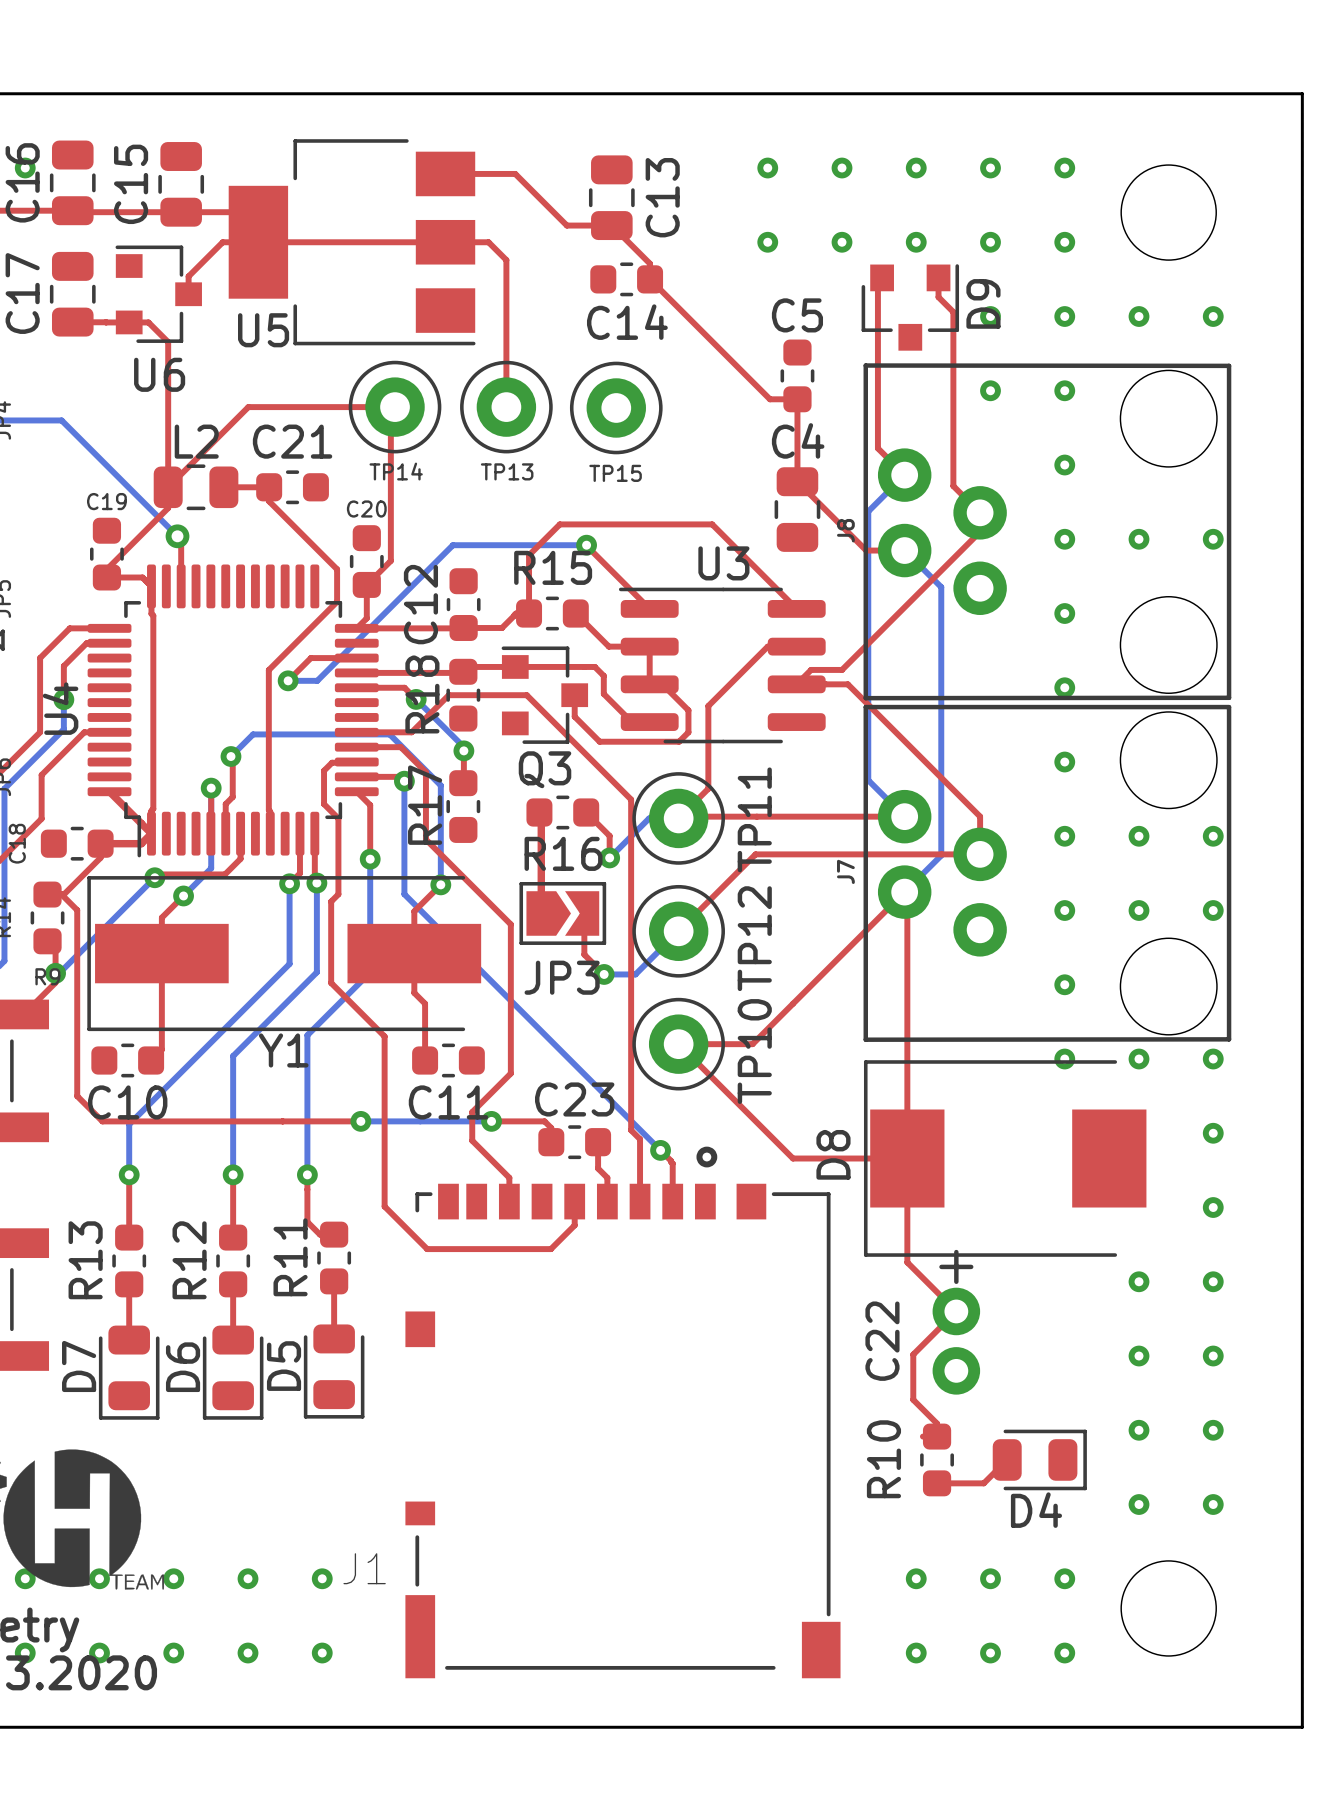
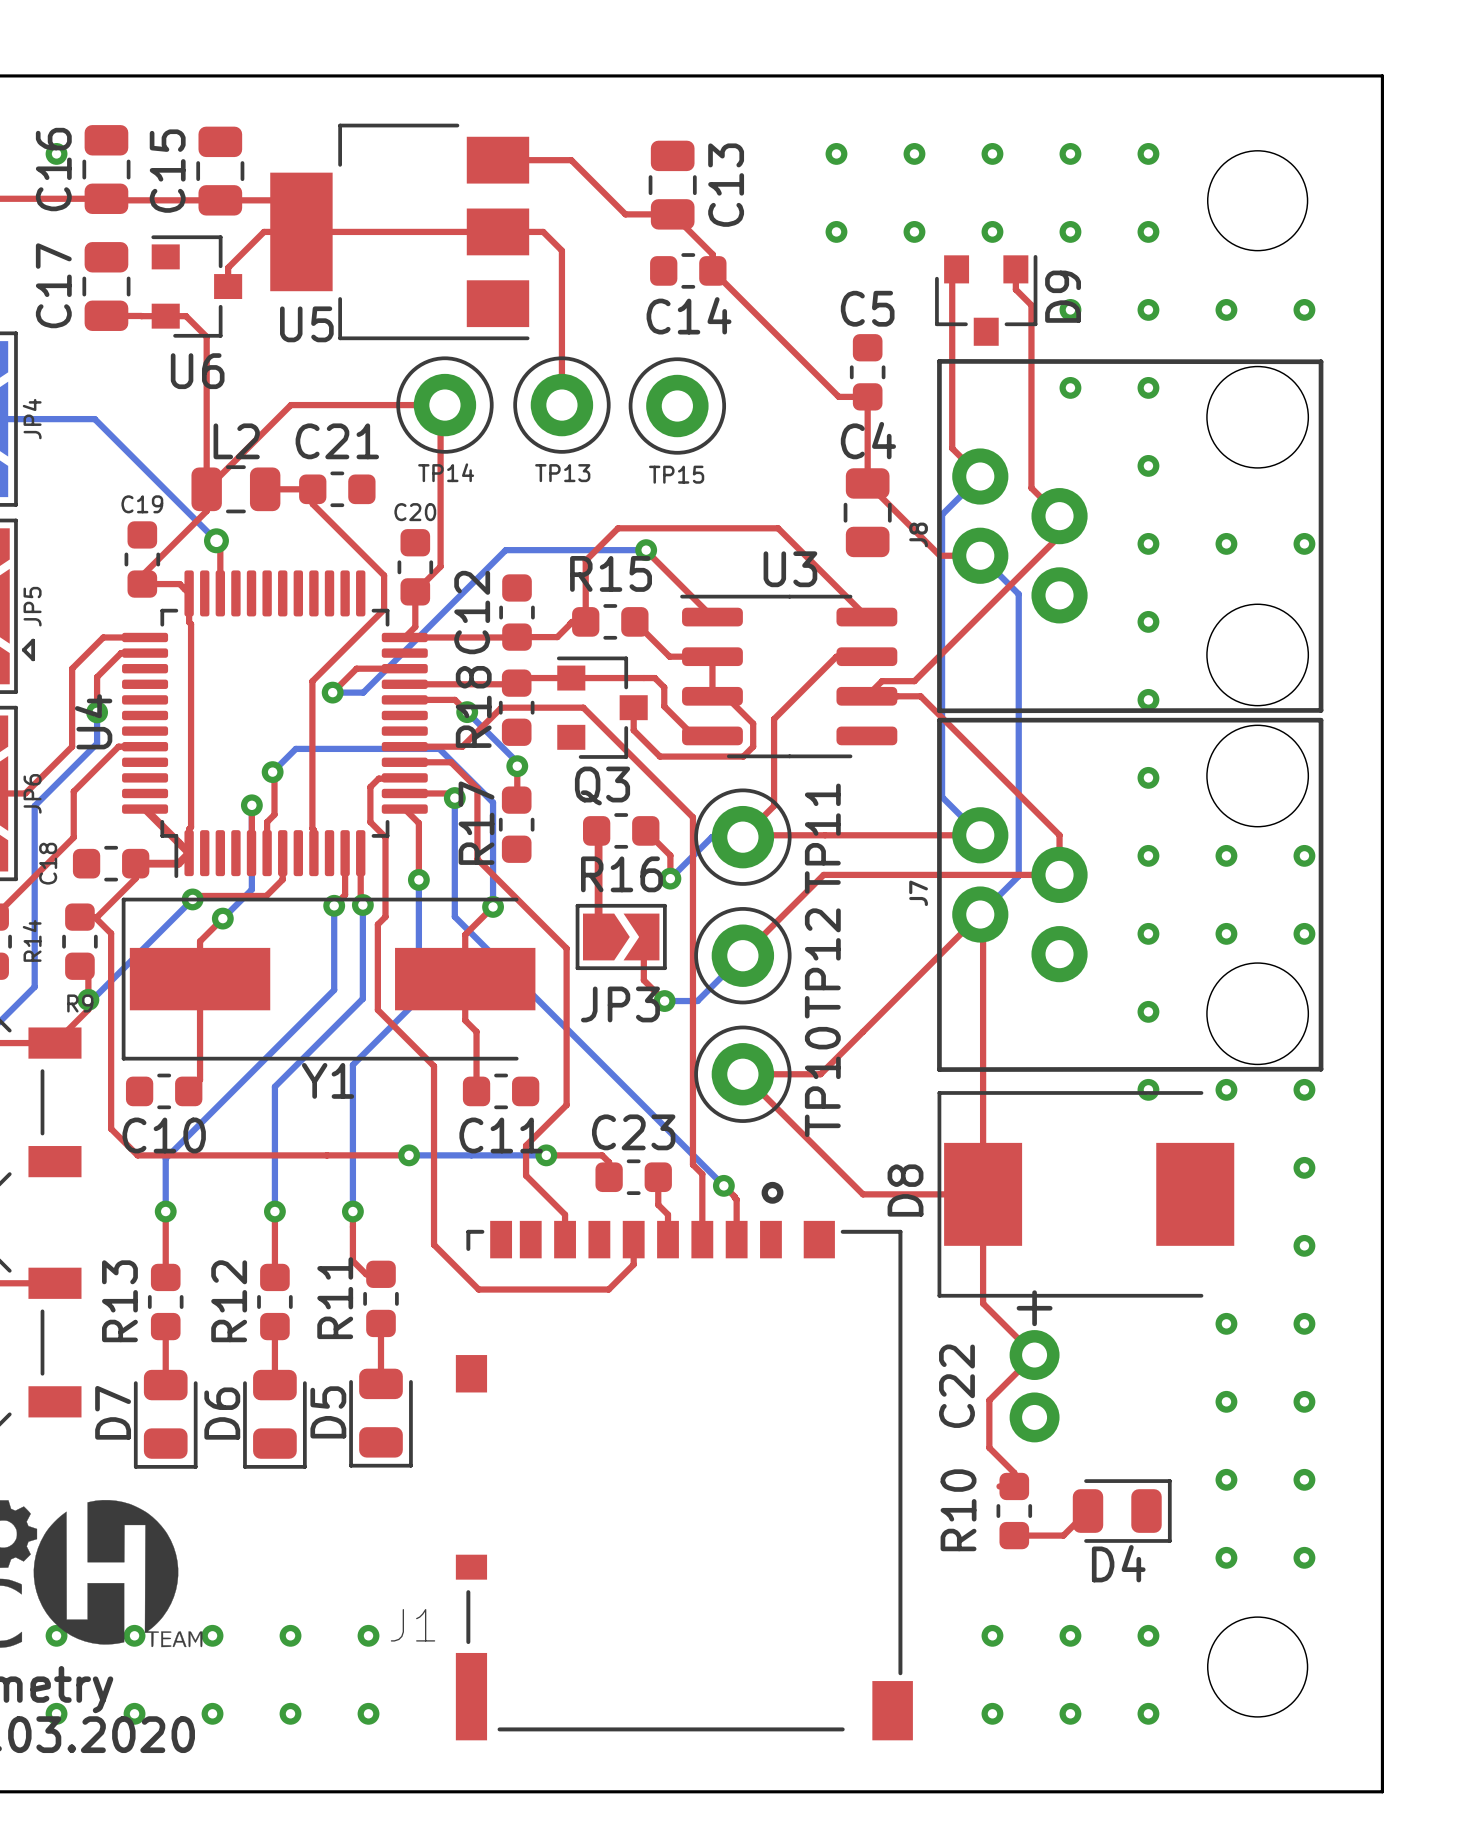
board edge: (1287, 93) (1302, 93) (1302, 1727) (1287, 1727) -> (1382, 75) (1382, 1791)

